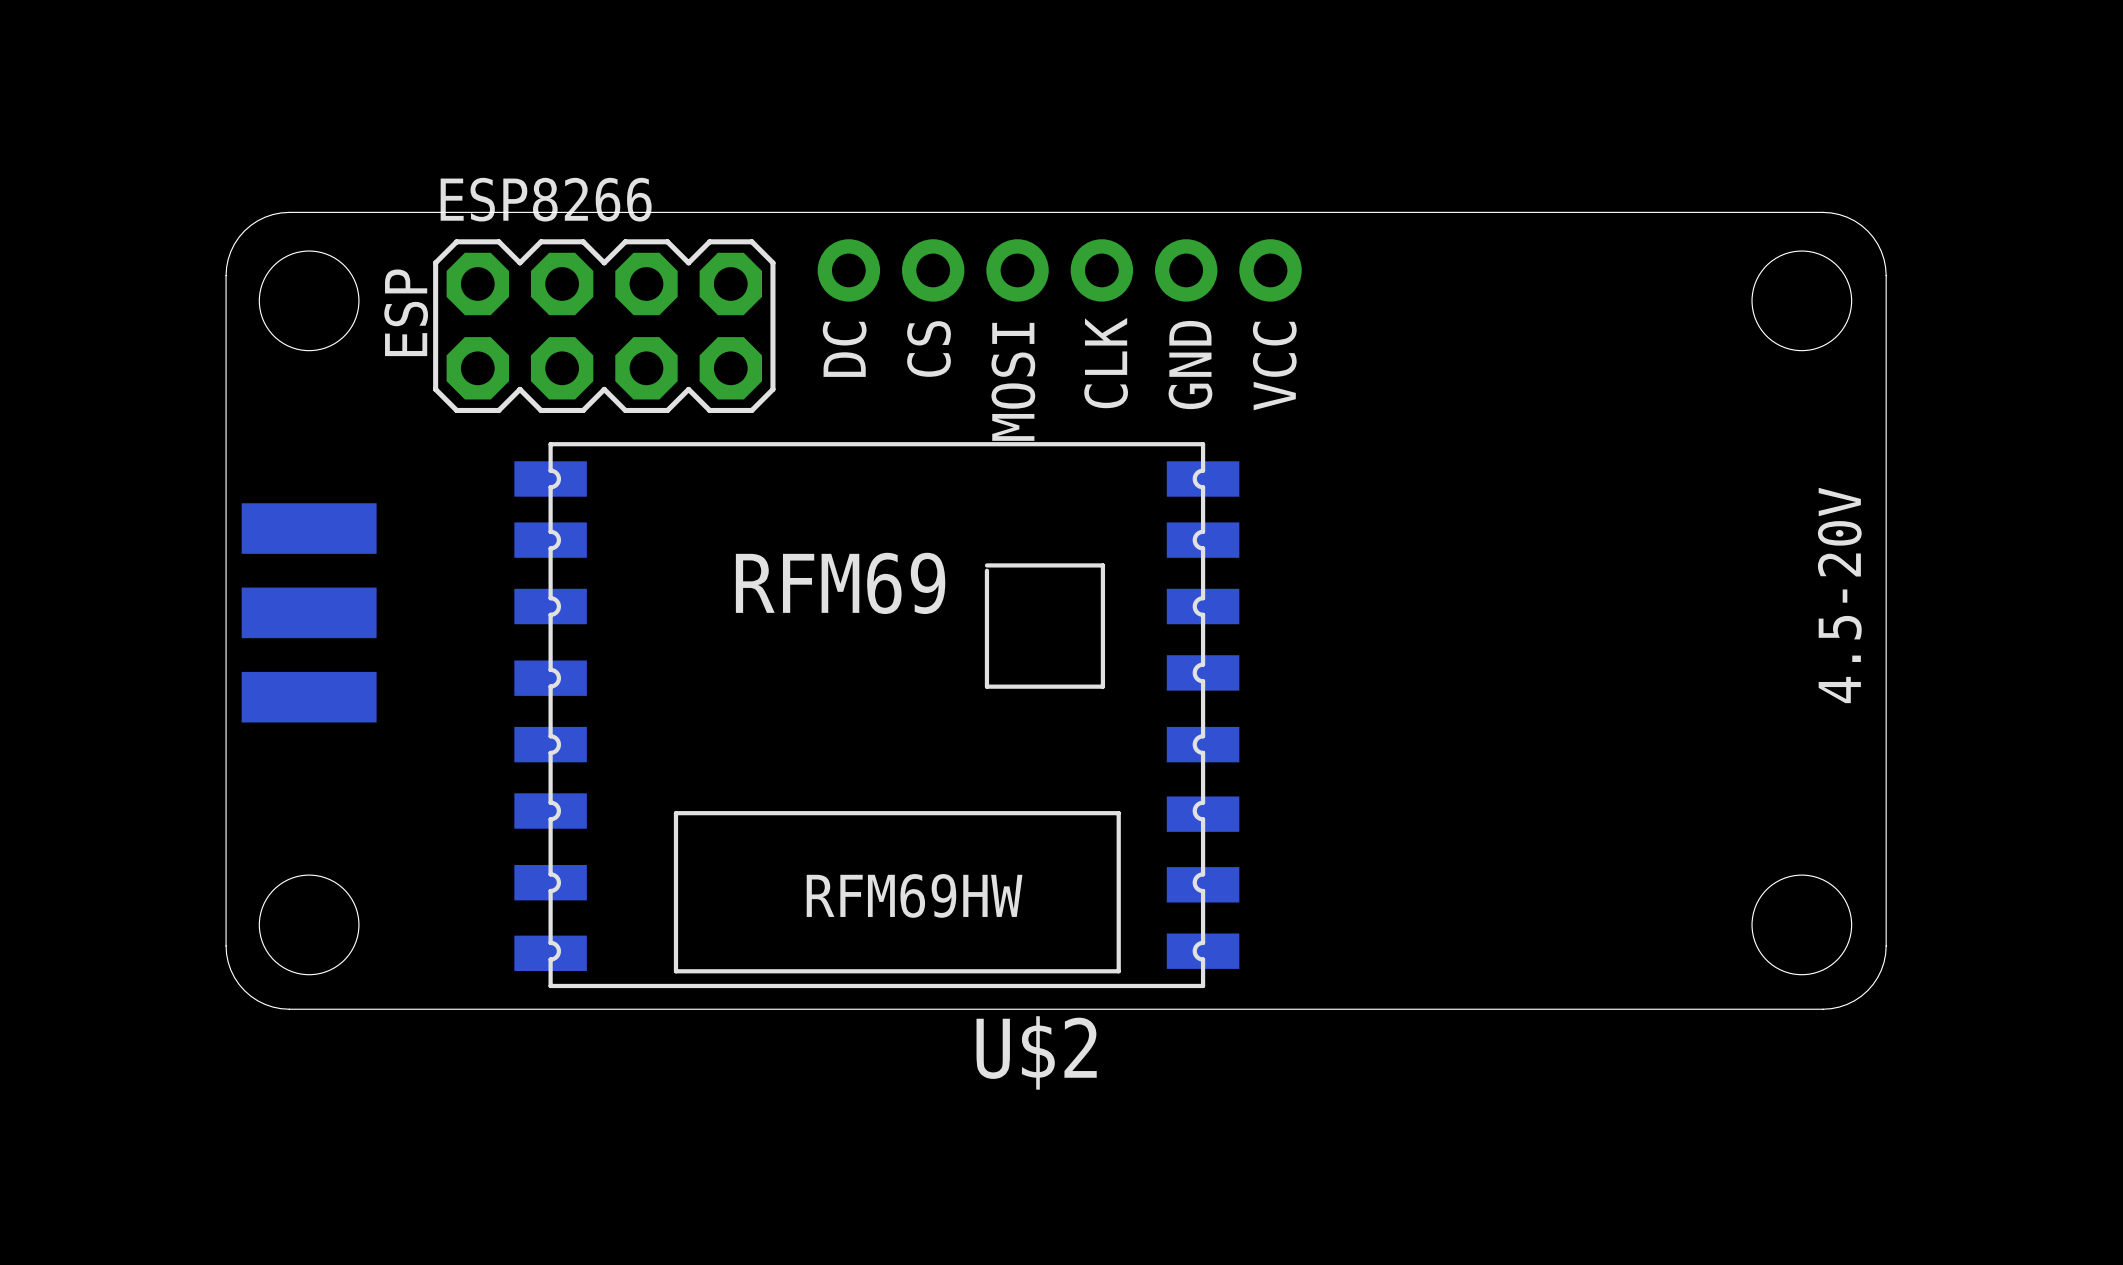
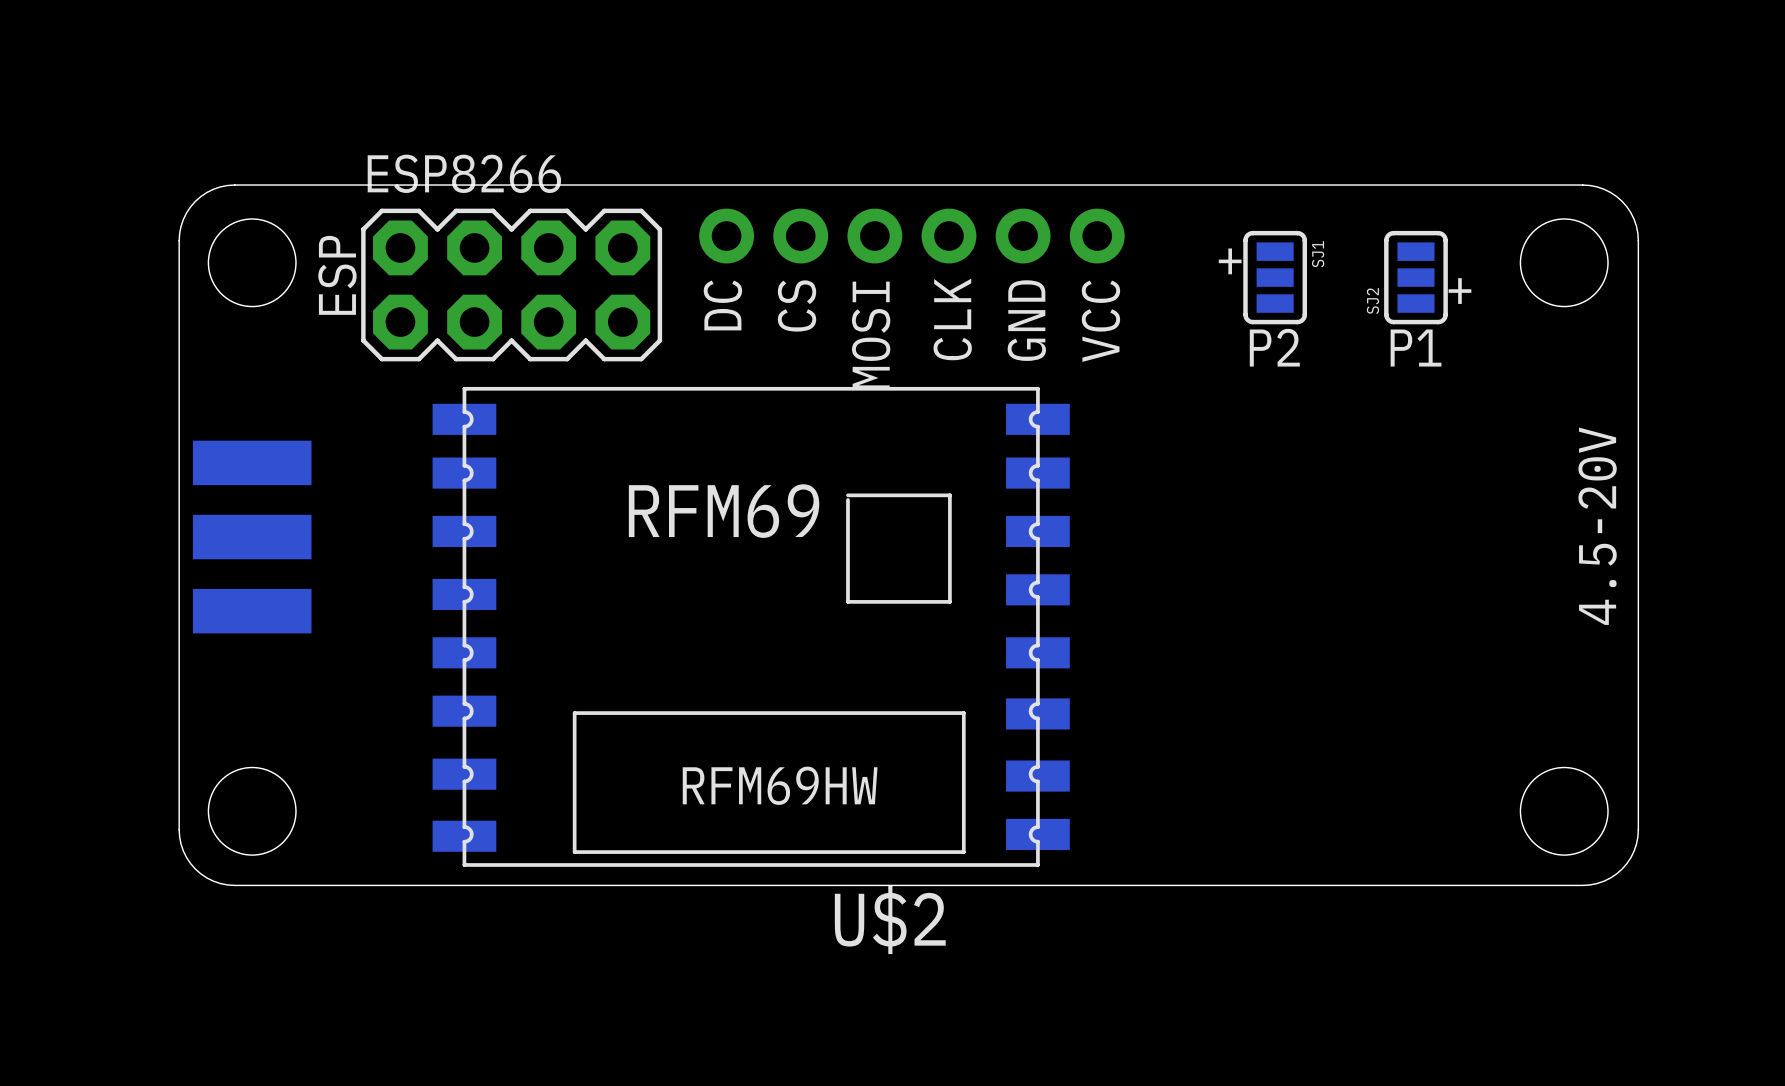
text: none -> + (1230, 261)
SJ1: none -> (1275, 277)
SJ2: none -> (1415, 277)
text: none -> + (1459, 291)
text: none -> P2 (1274, 347)
text: none -> P1 (1416, 348)

